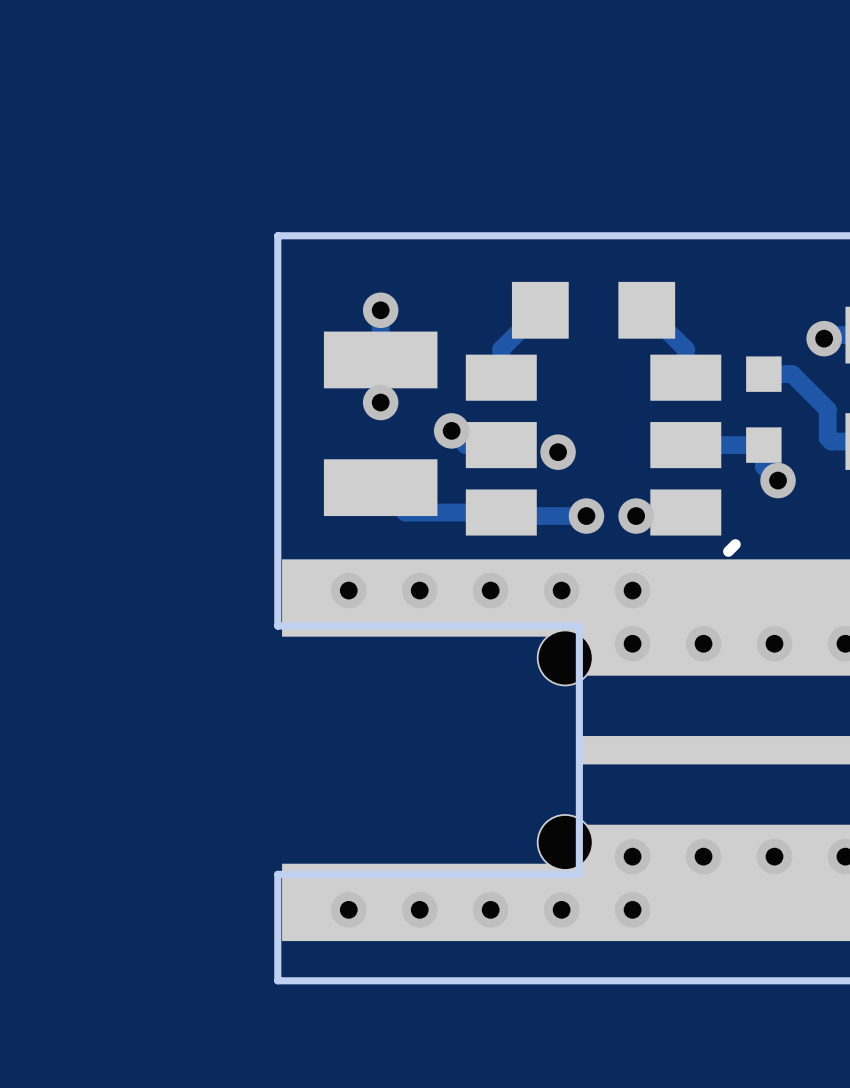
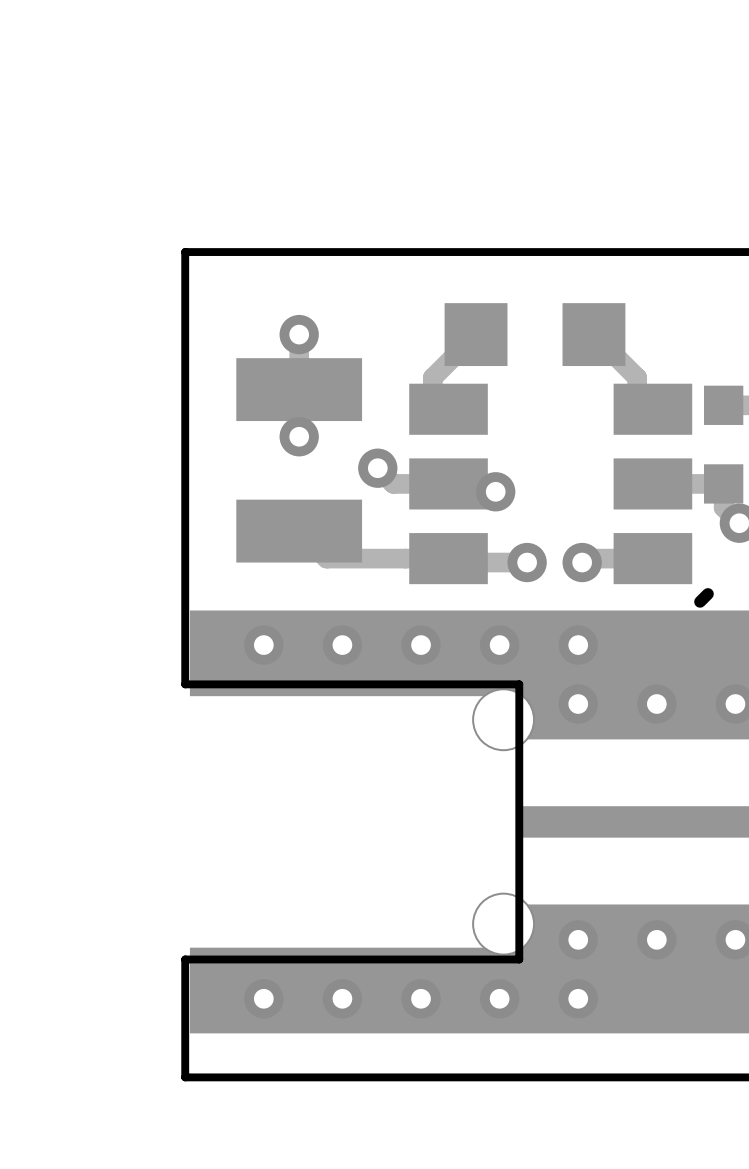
part position: (603, 455) -> (561, 495)

